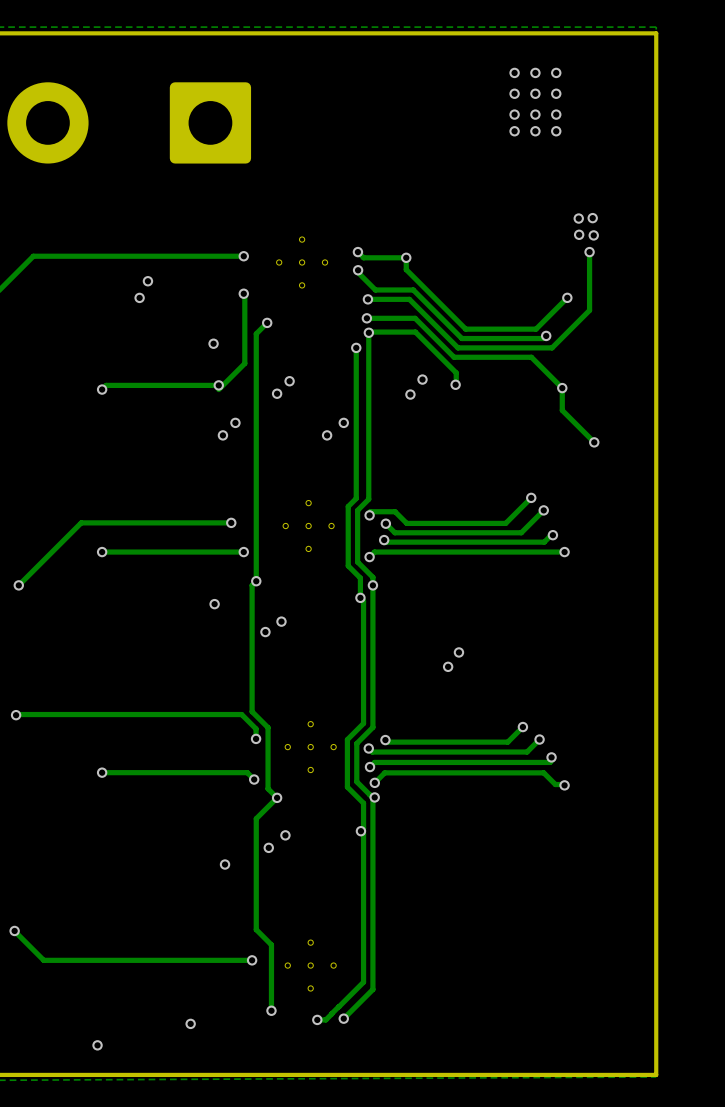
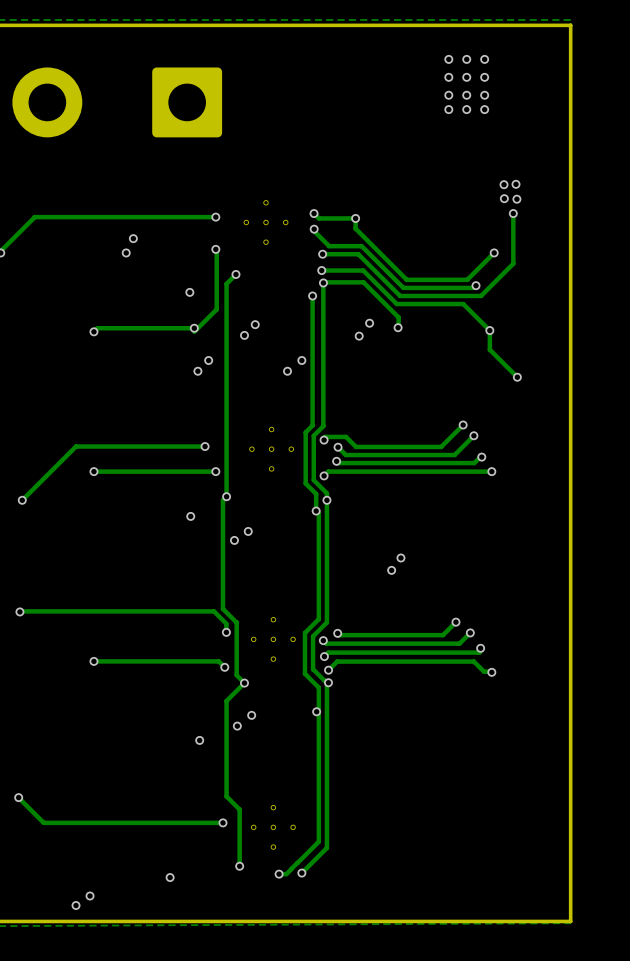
via: none -> (76, 905)

